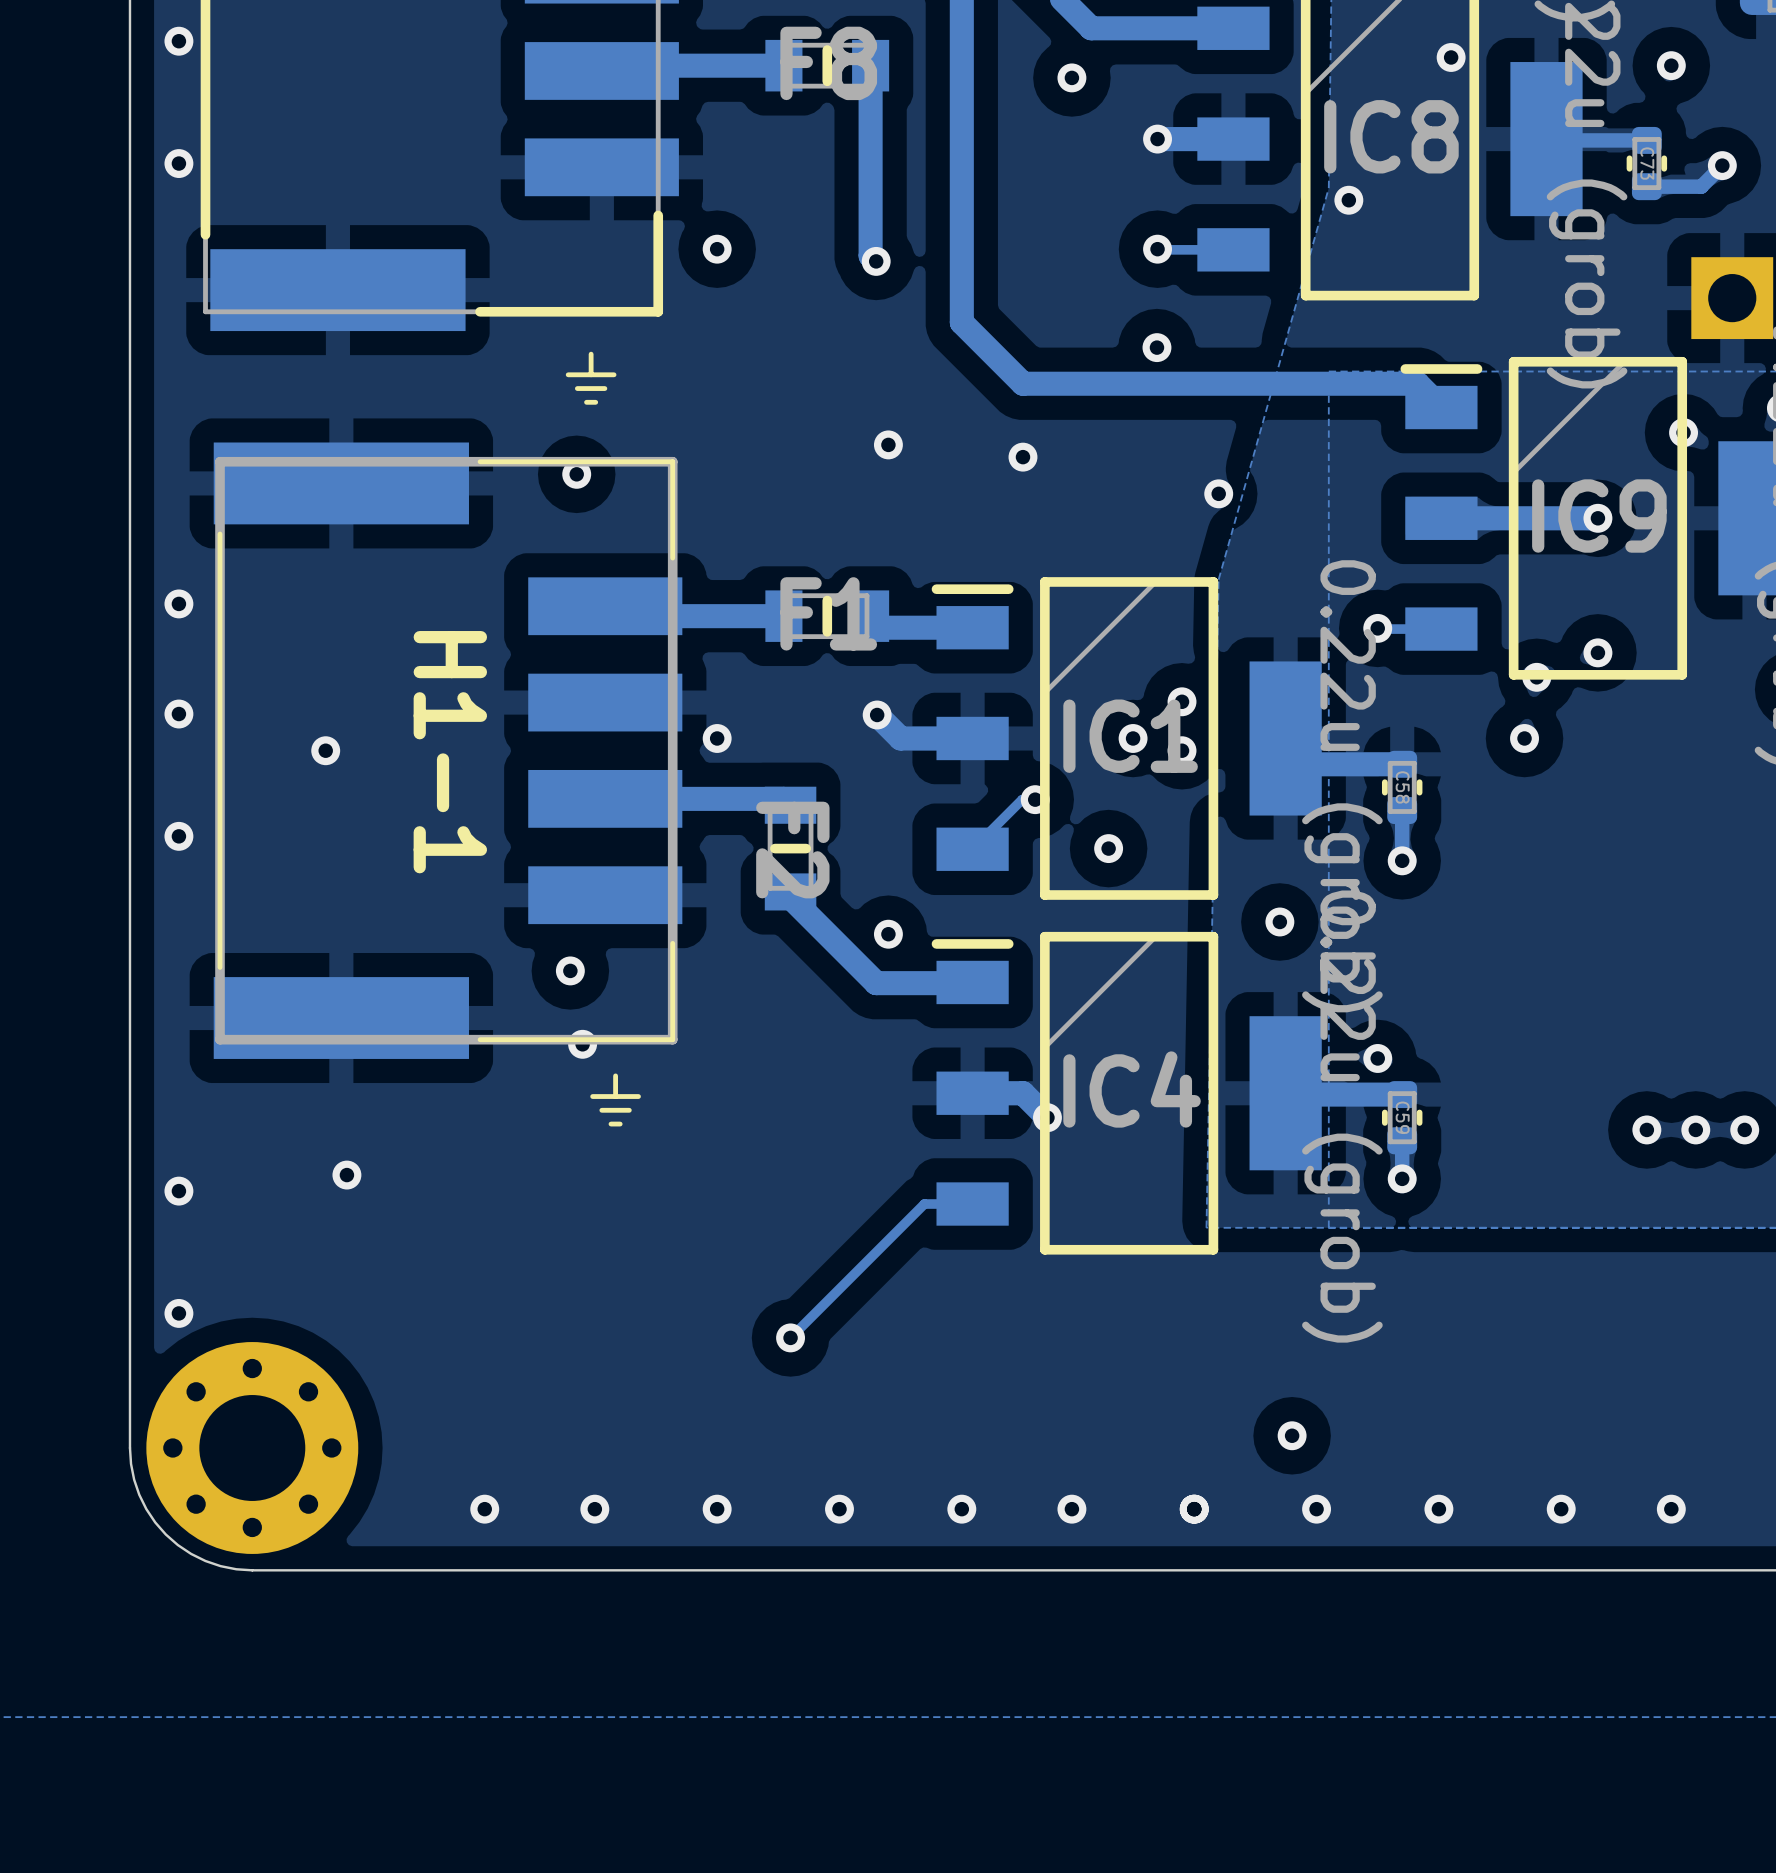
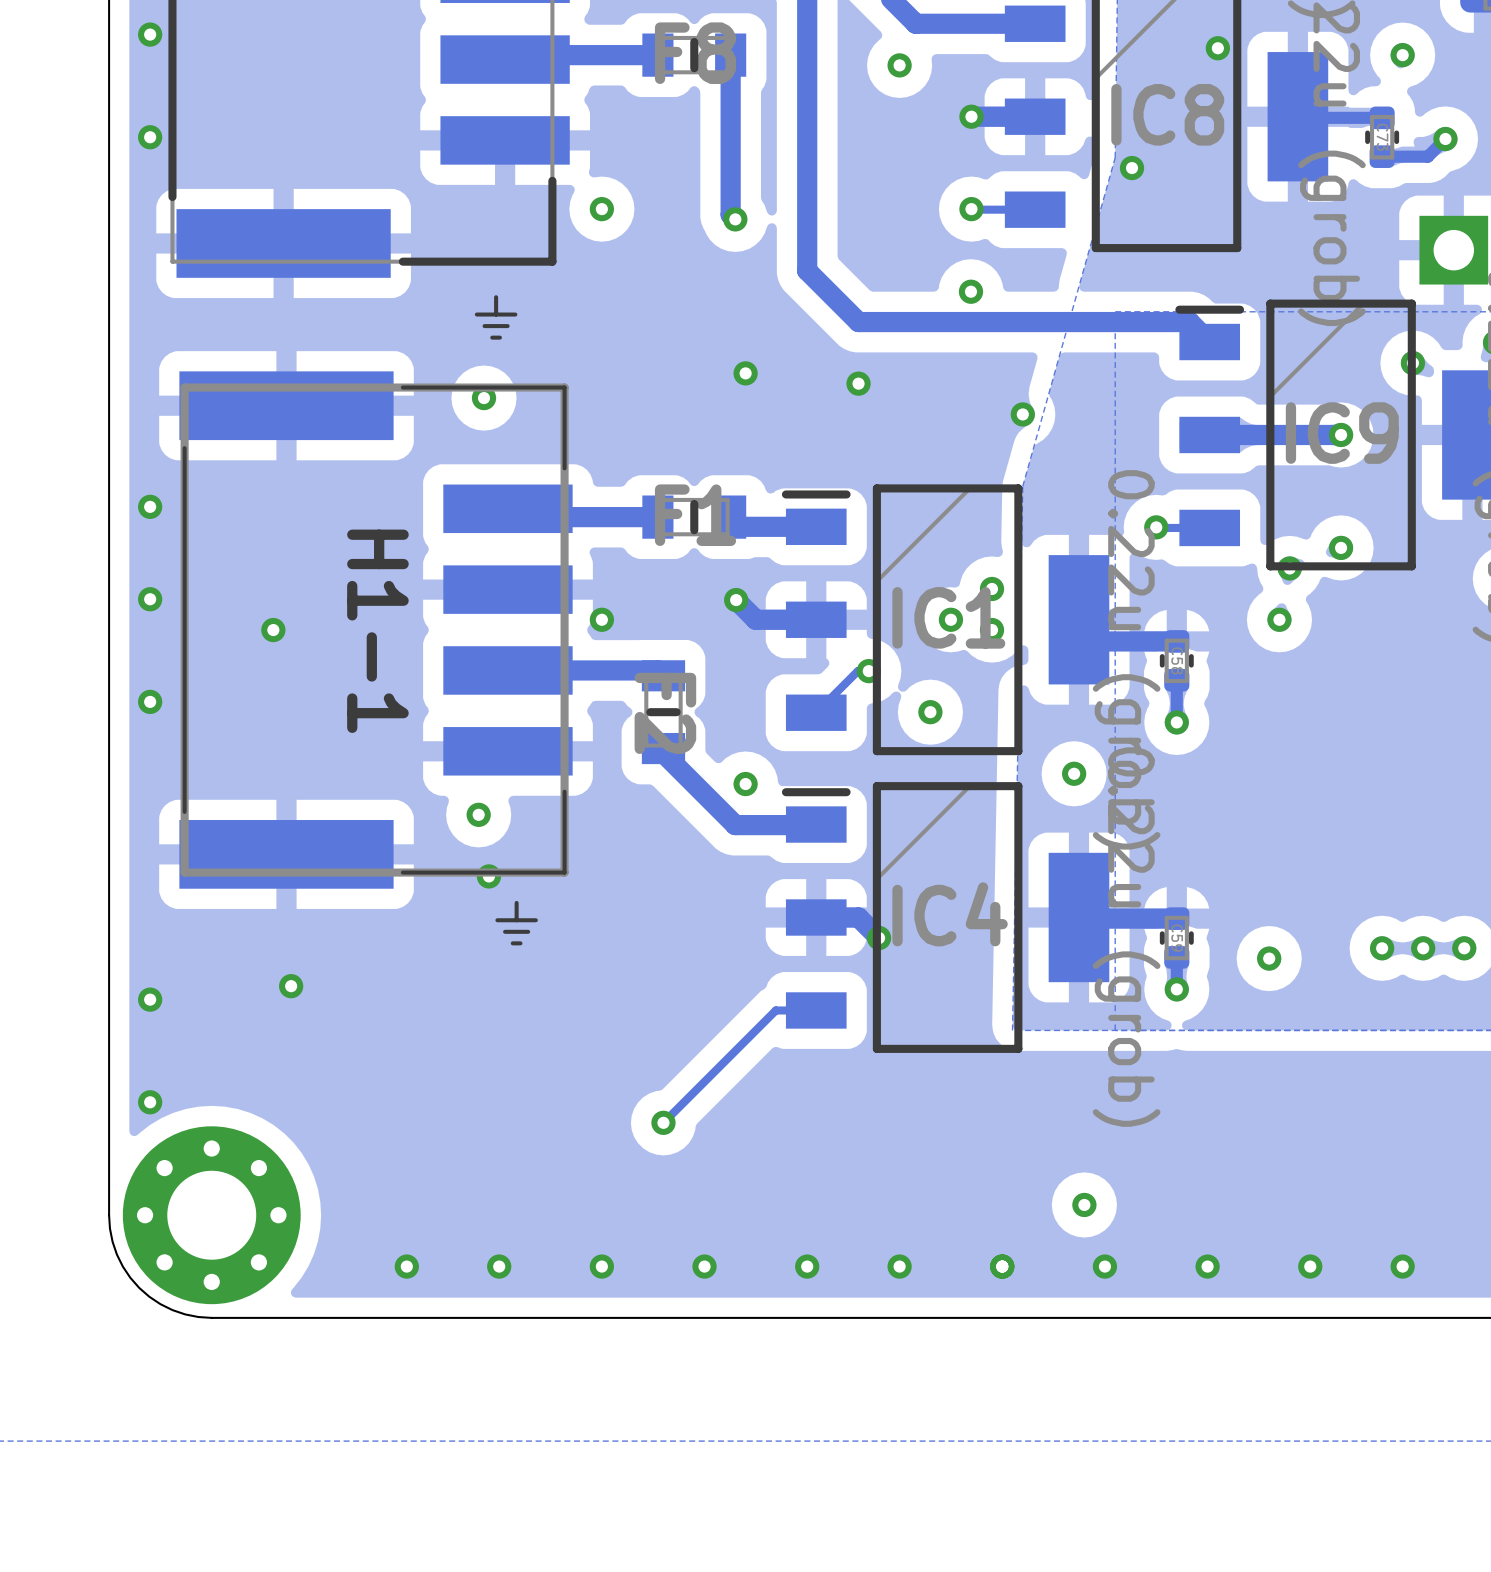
via position: (1377, 1058) -> (1269, 958)

